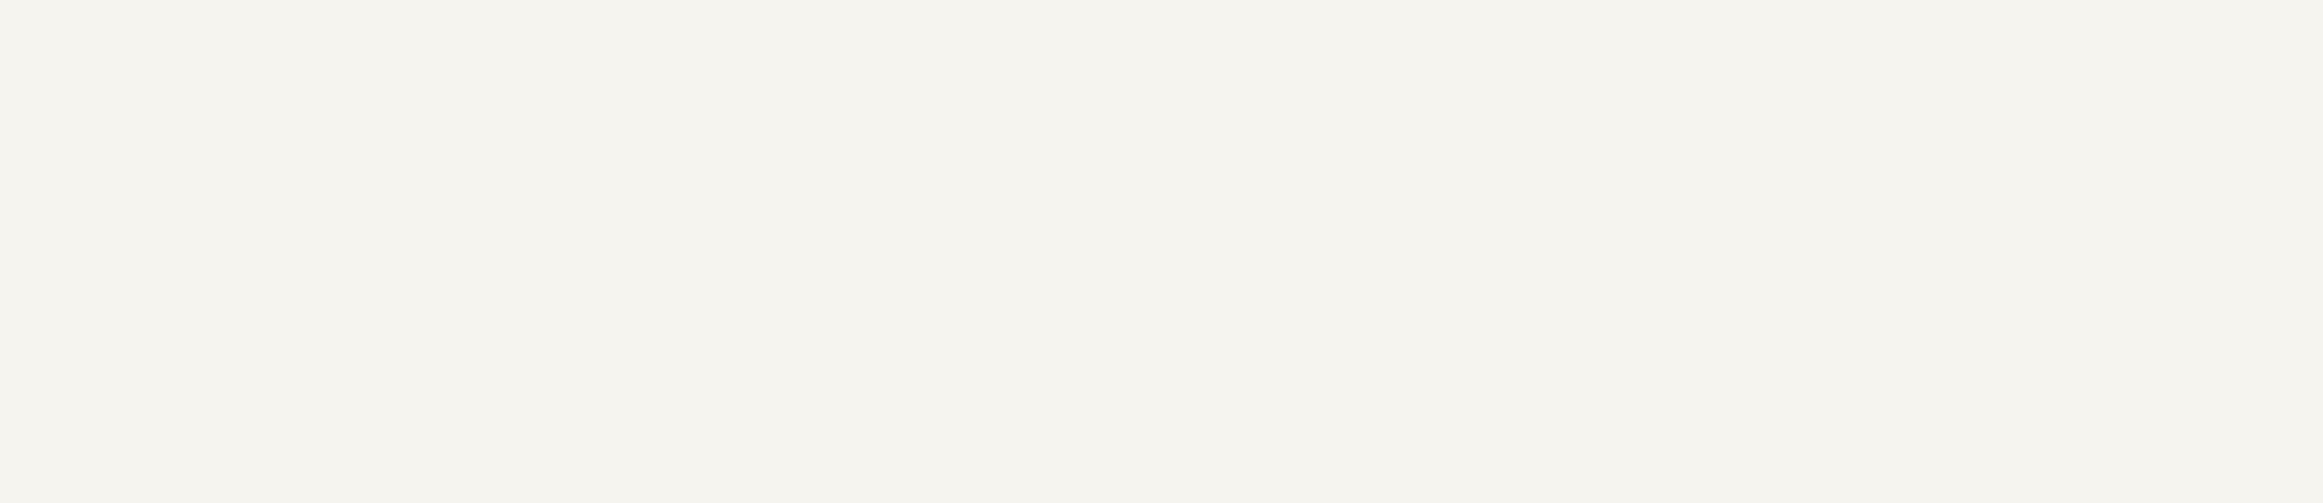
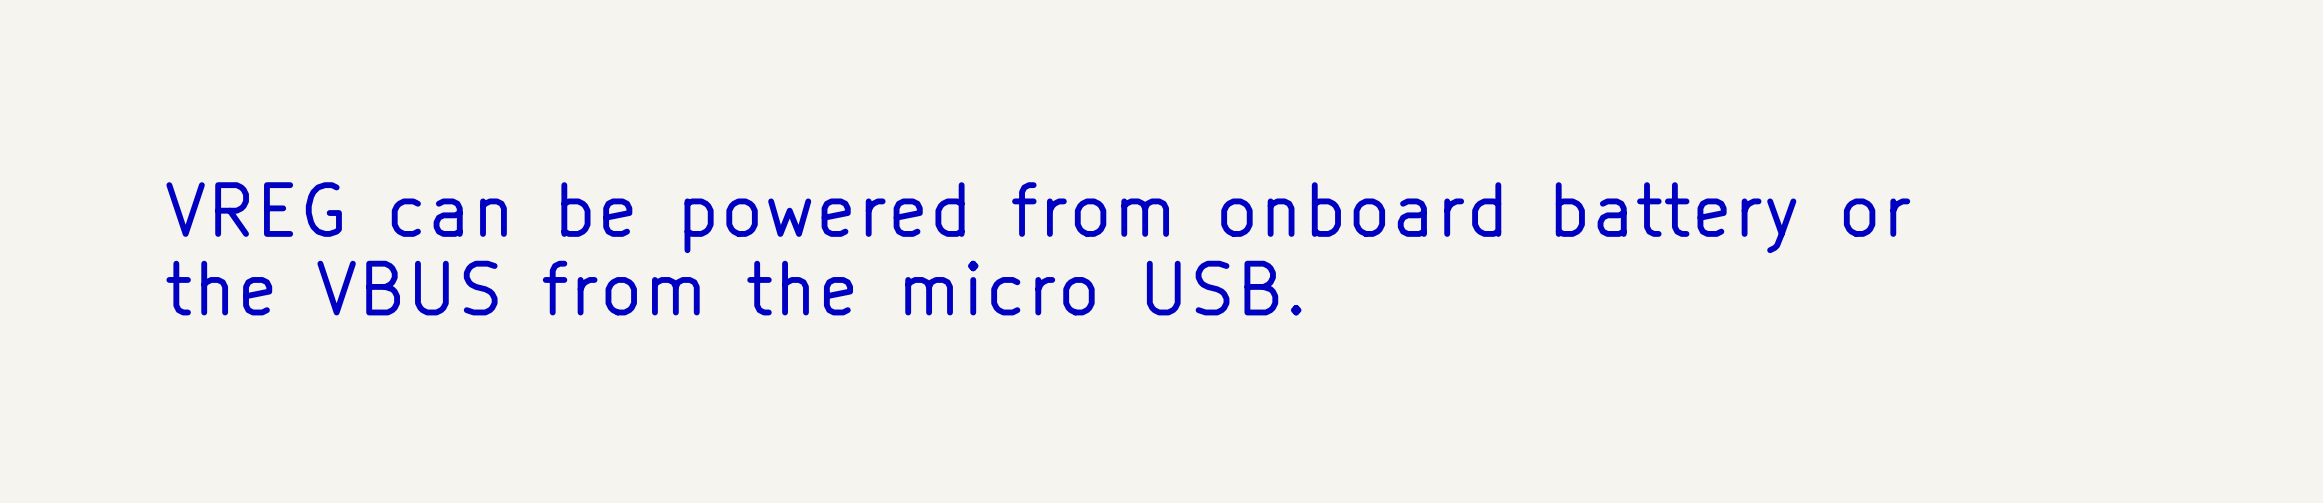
text: none -> VREG can be powered from onboard battery or (1038, 217)
text: none -> the VBUS from the micro USB. (733, 288)

